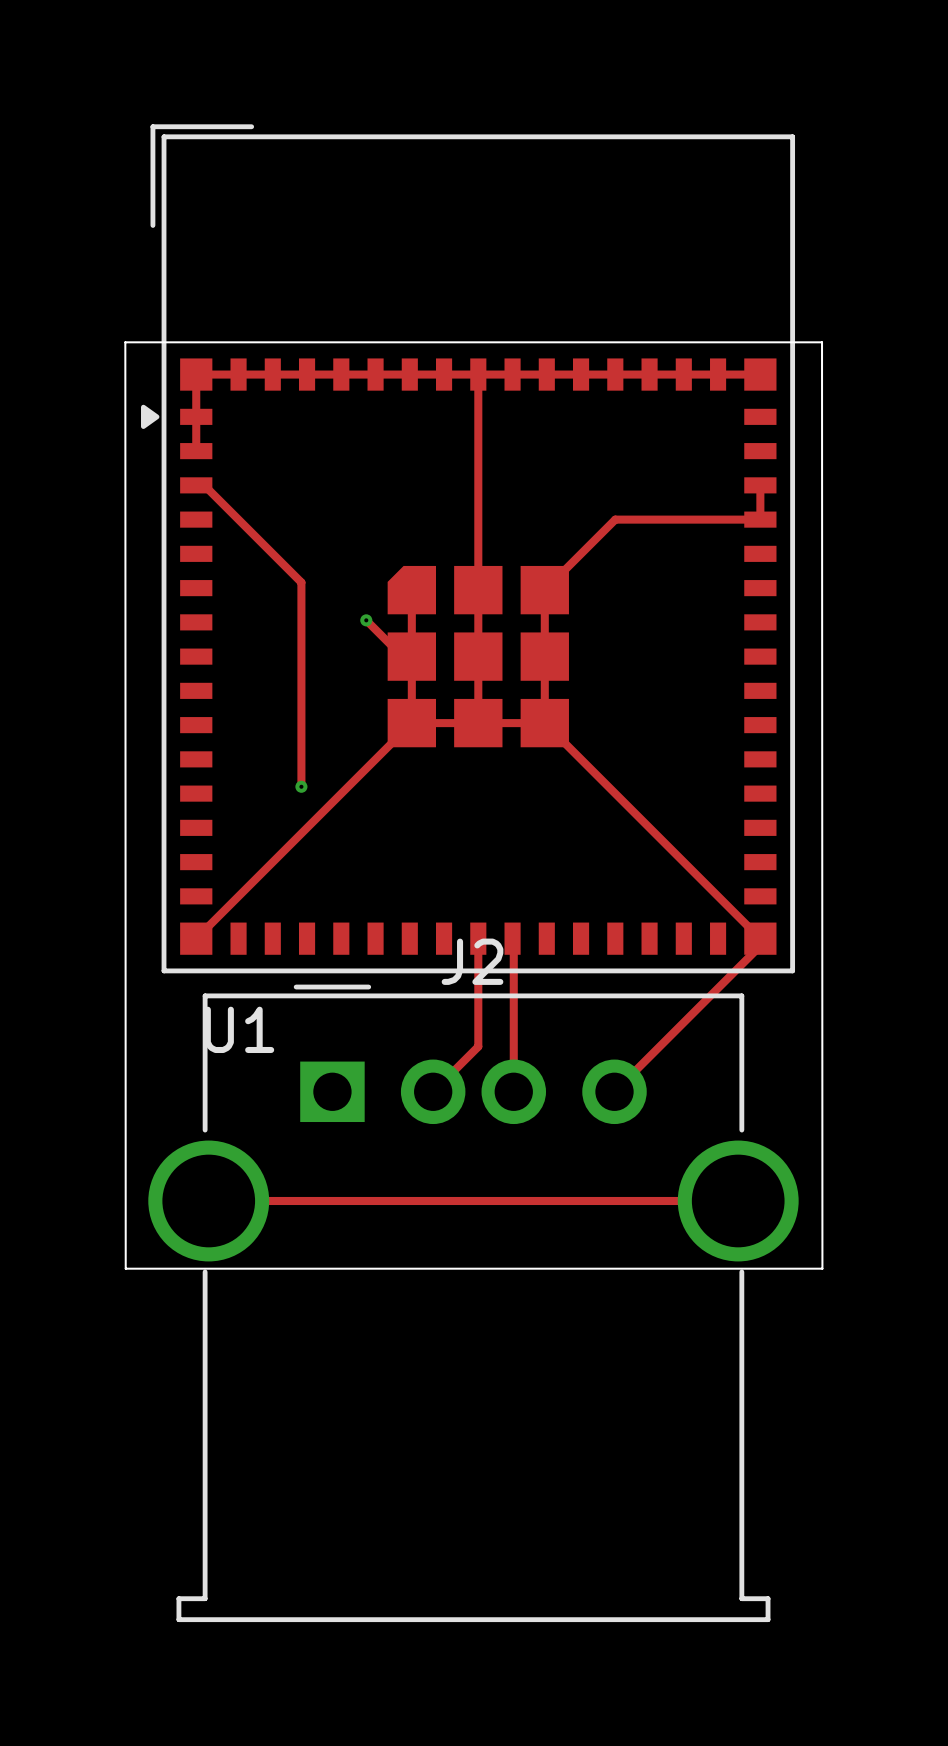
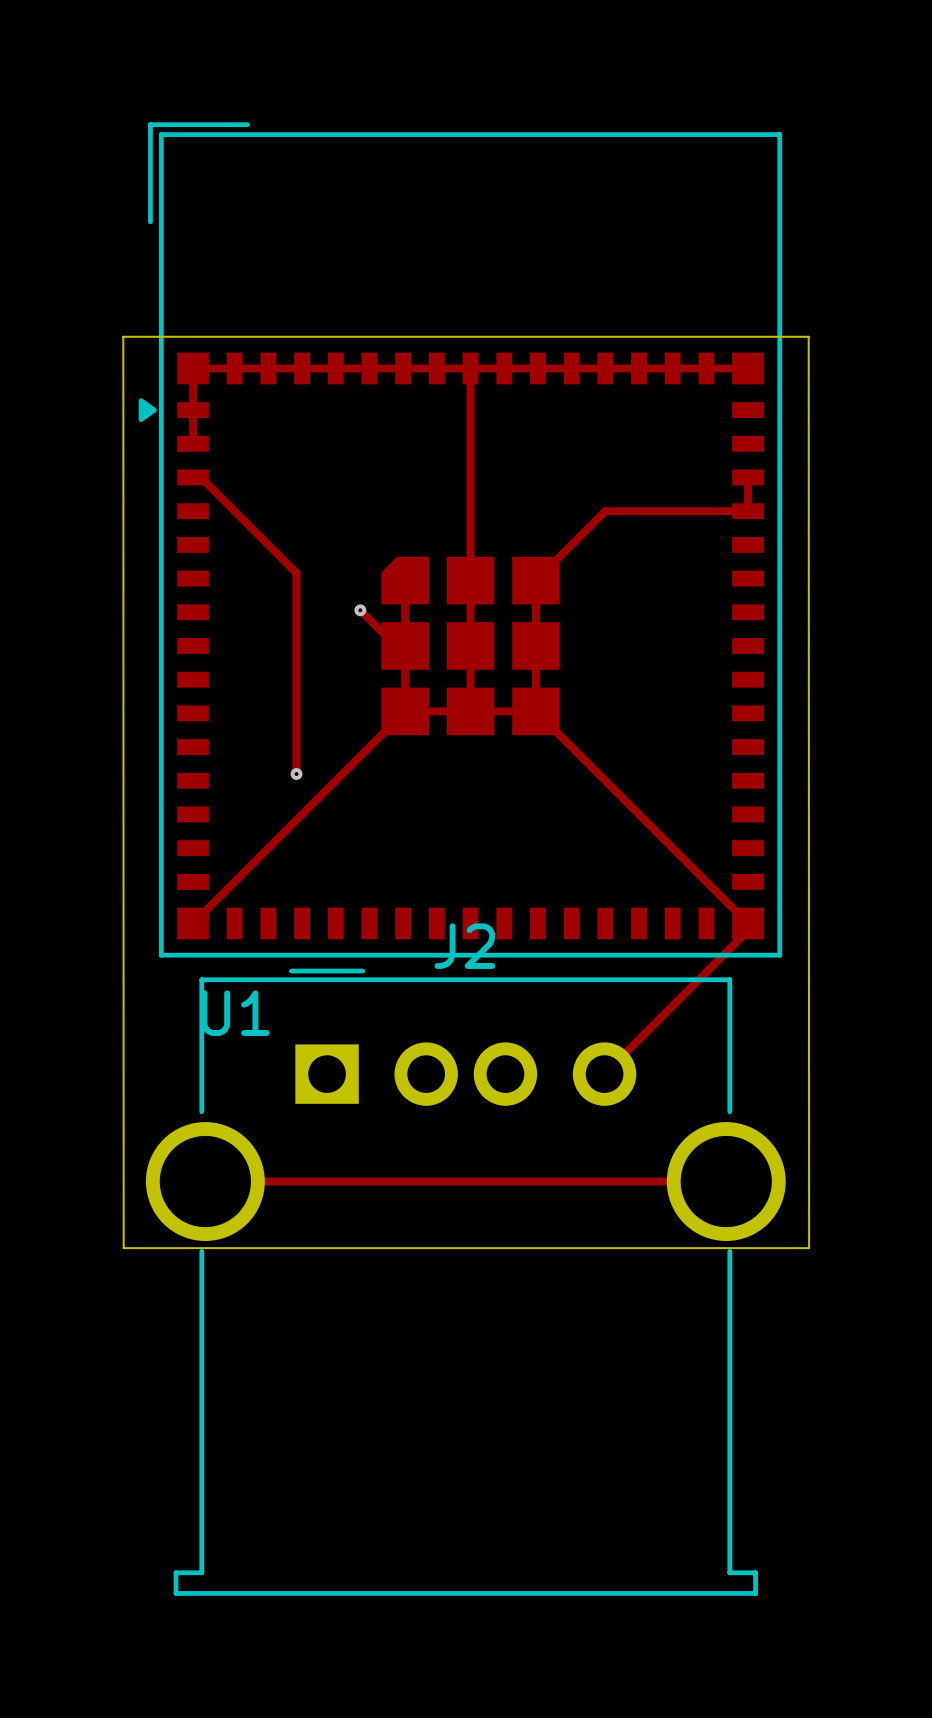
track: (478, 938) (478, 1046) (433, 1091) -> none
track: (512, 938) (513, 1091) -> none

